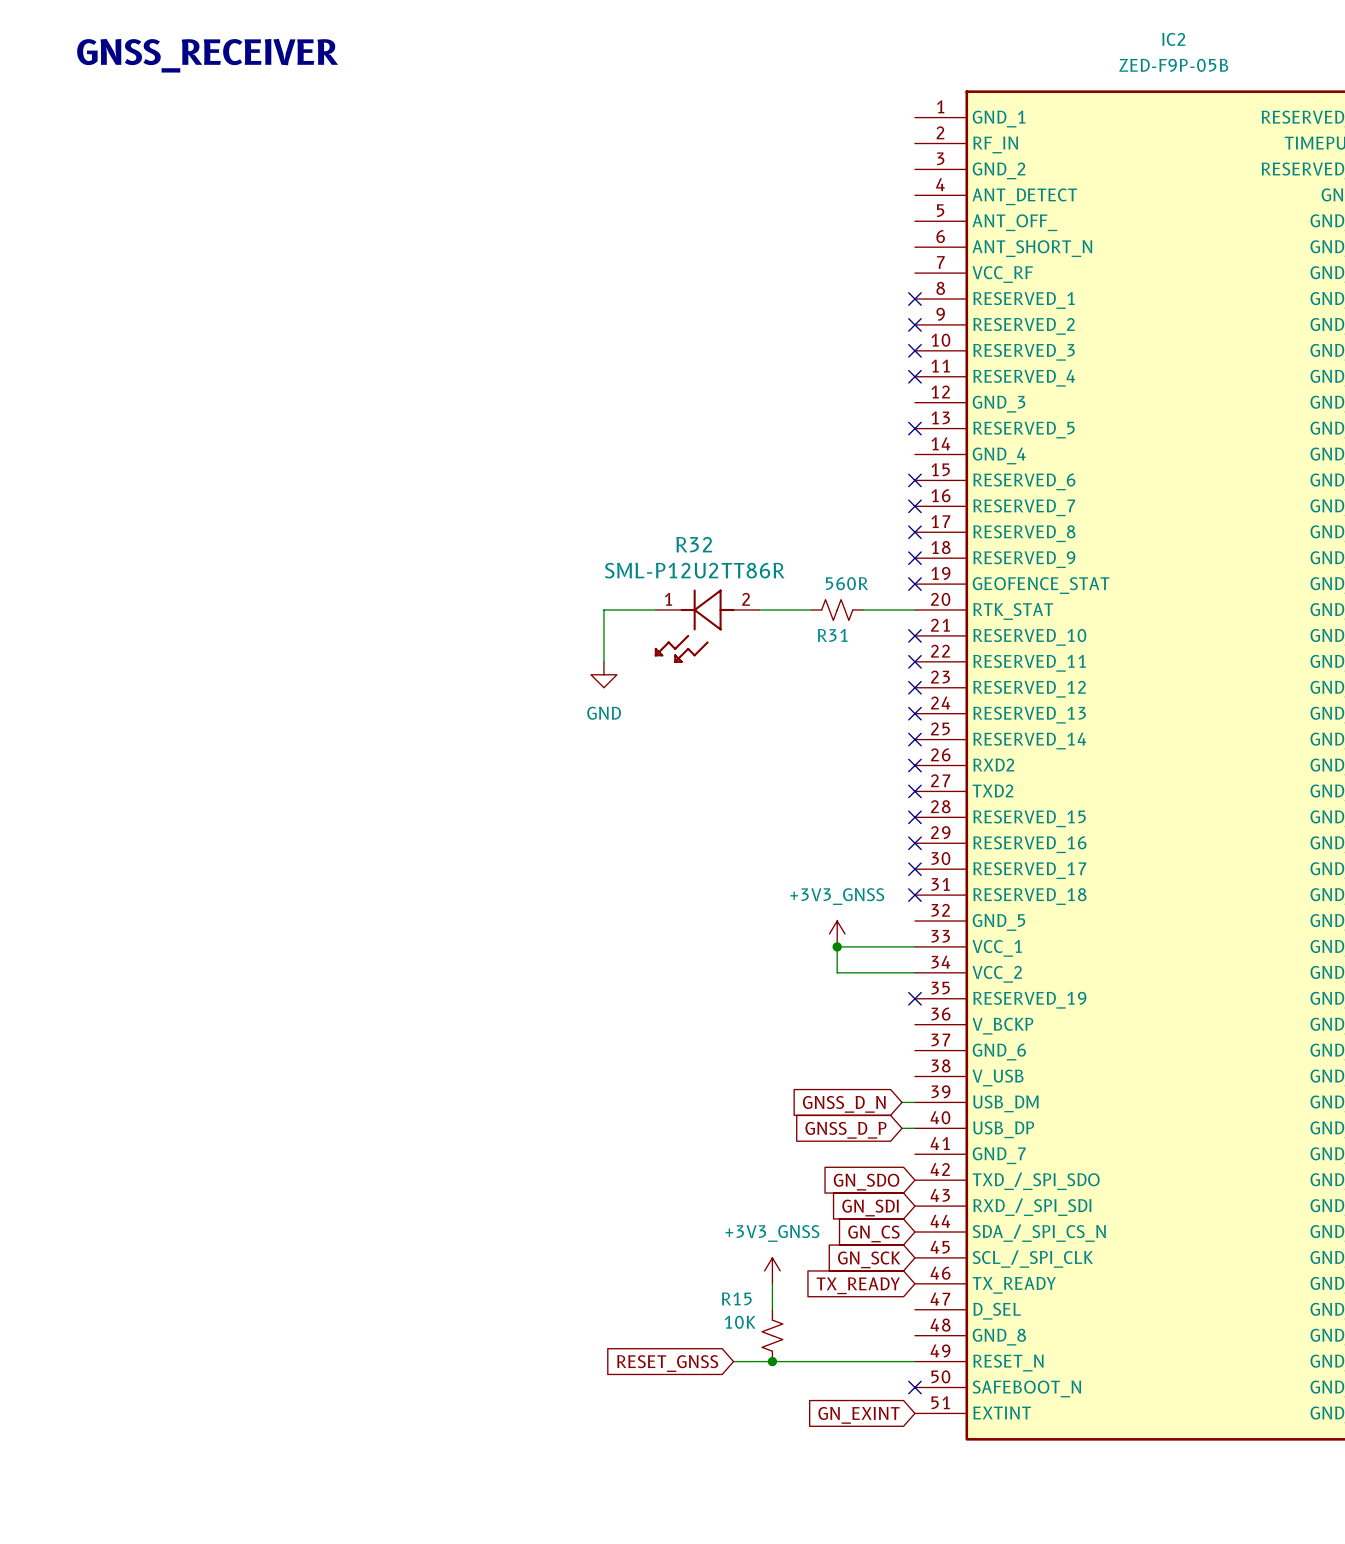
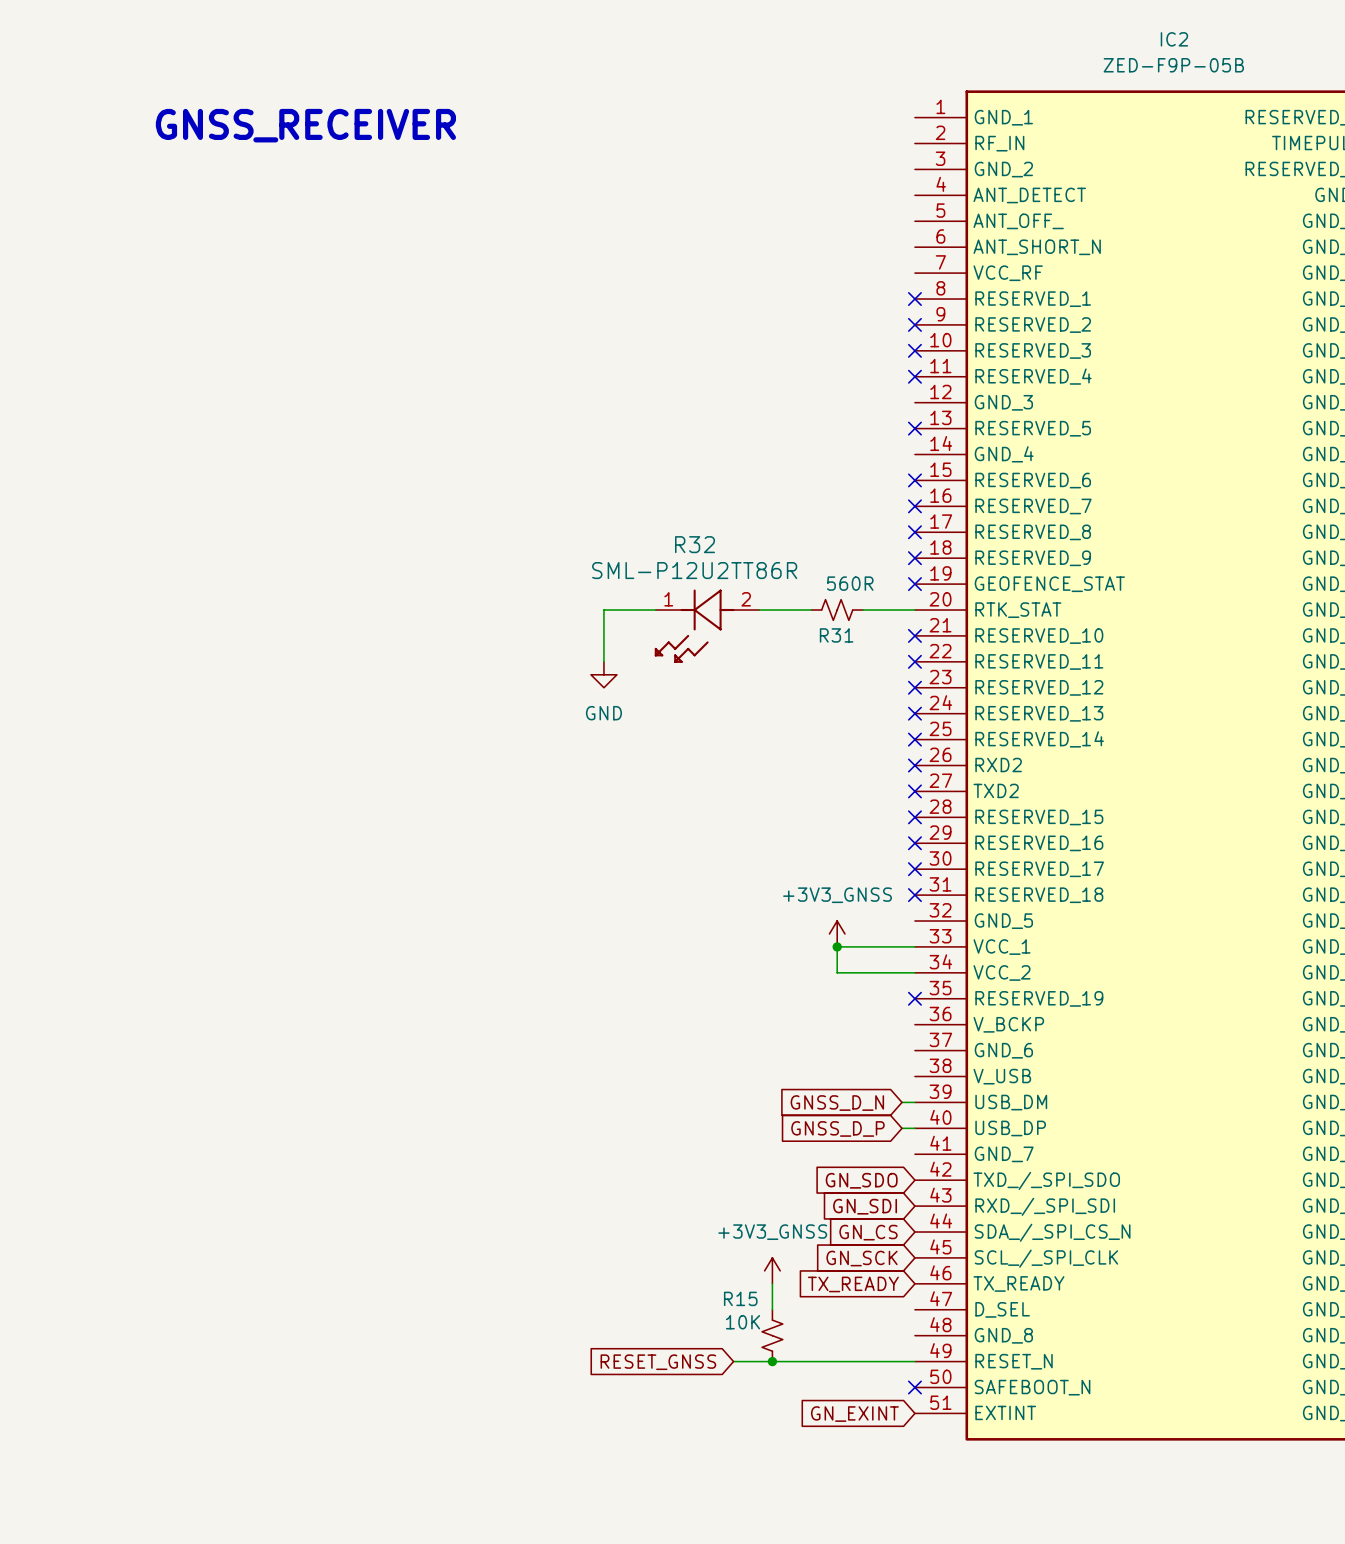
text position: GNSS_RECEIVER (207, 55) -> GNSS_RECEIVER (305, 125)

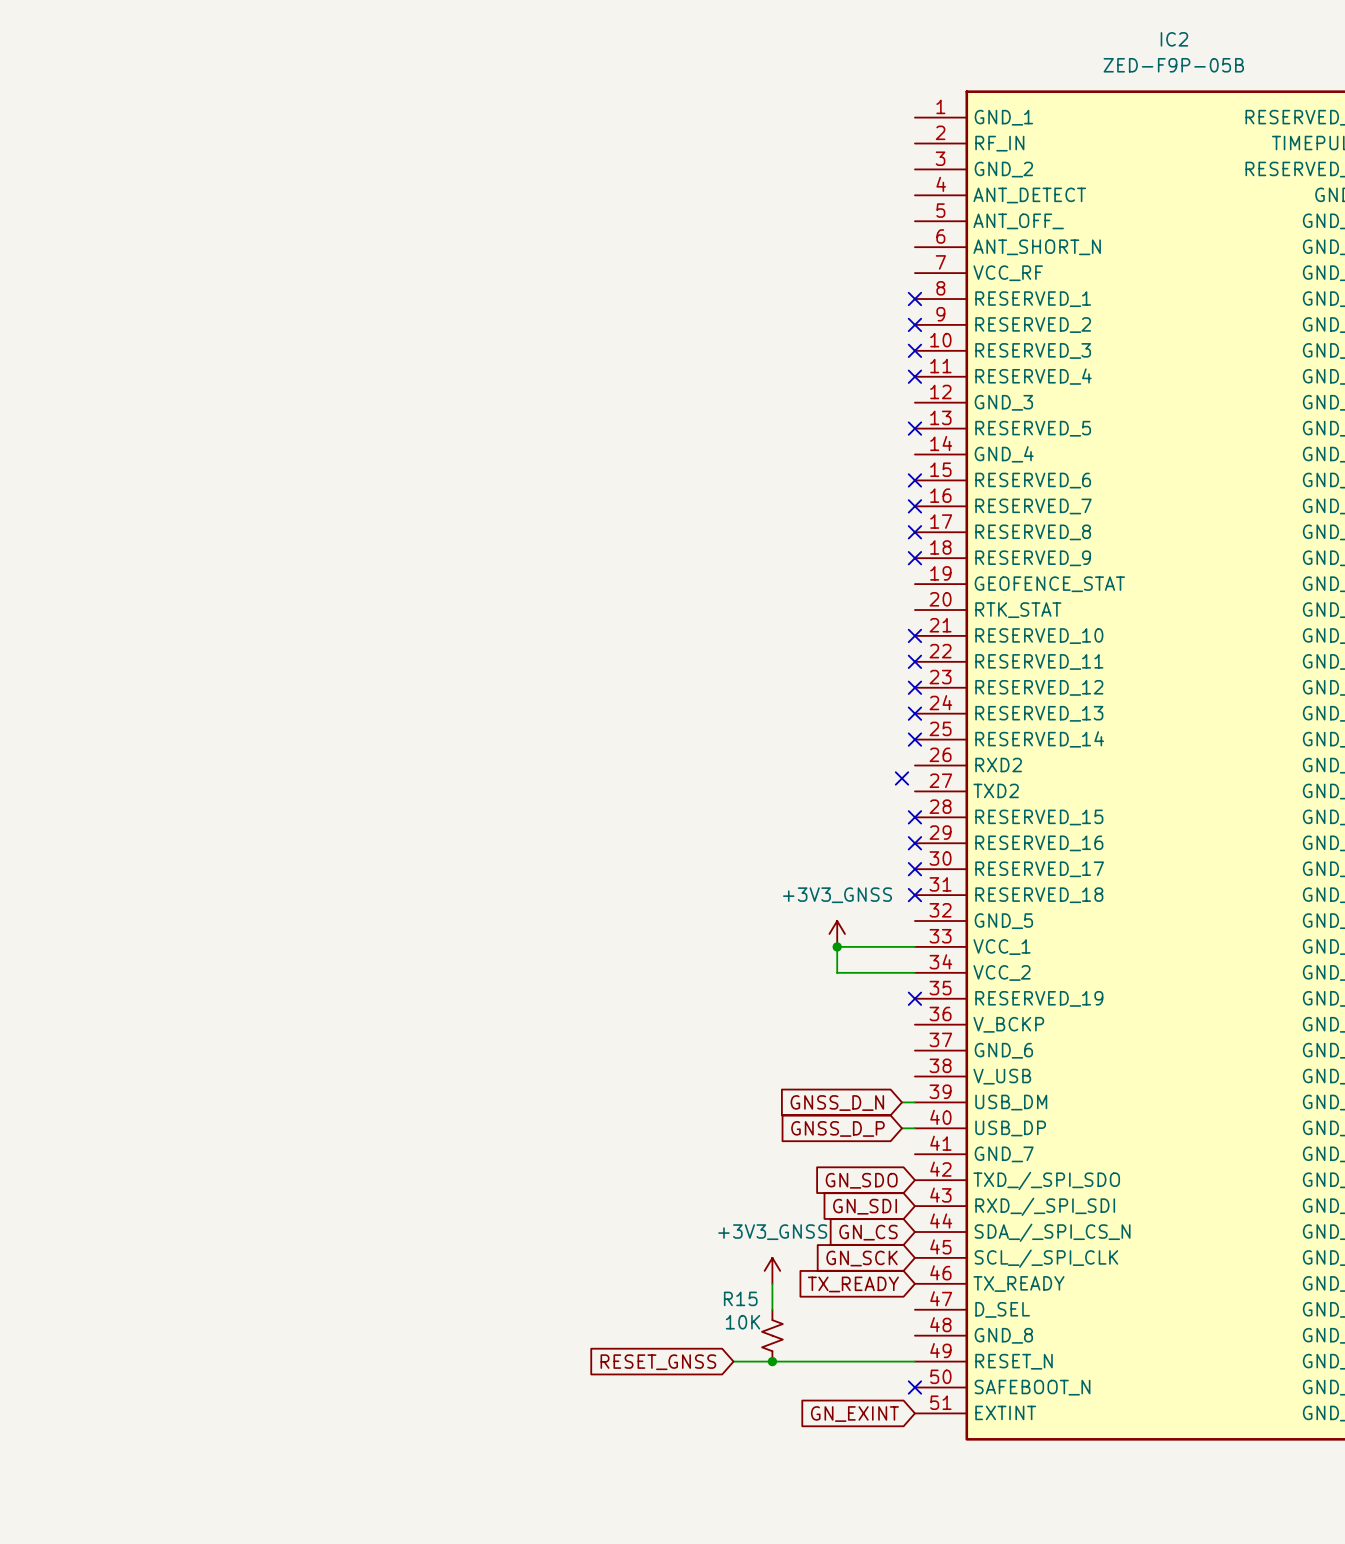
text: GNSS_RECEIVER (305, 125) -> none
no-connect mark: (914, 584) -> none
wire: (655, 610) (603, 610) (603, 661) -> none
wire: (759, 610) (811, 610) -> none
R31: 560R (837, 610) -> none
wire: (863, 610) (914, 610) -> none
R32: SML-P12U2TT86R (707, 626) -> none
power symbol: GND (603, 674) -> none
no-connect mark: (914, 765) -> none
no-connect mark: none -> (901, 778)
no-connect mark: (914, 791) -> none

